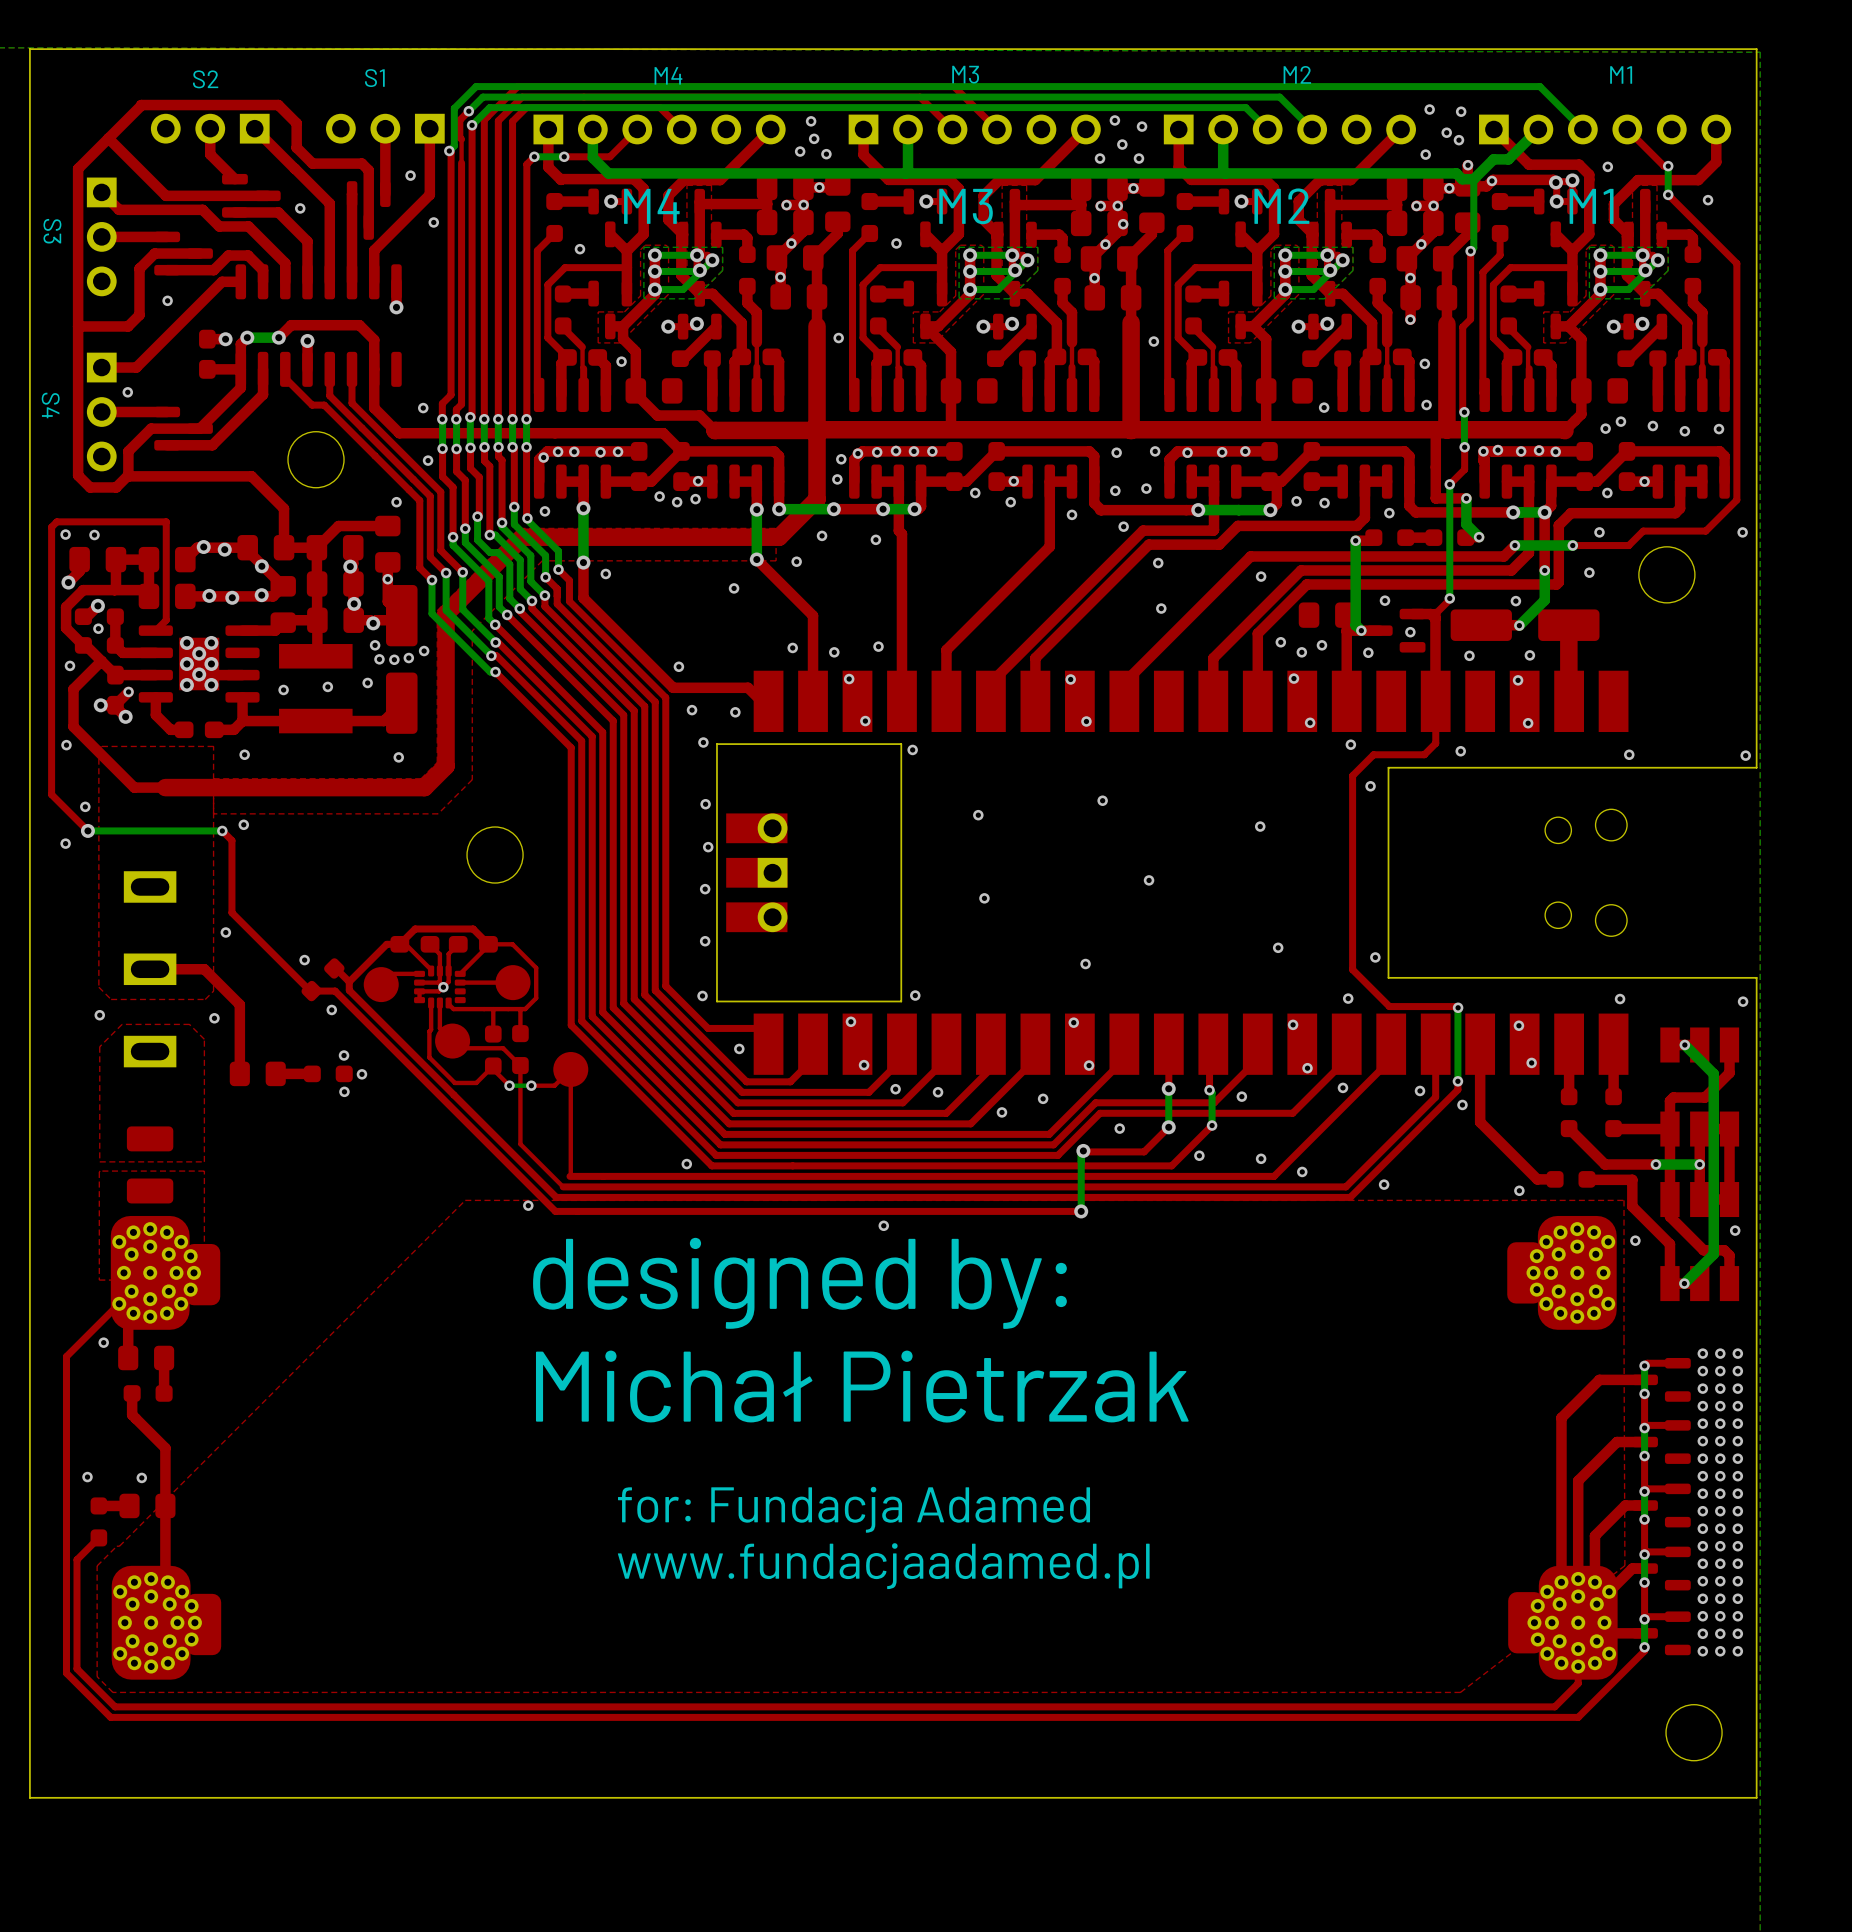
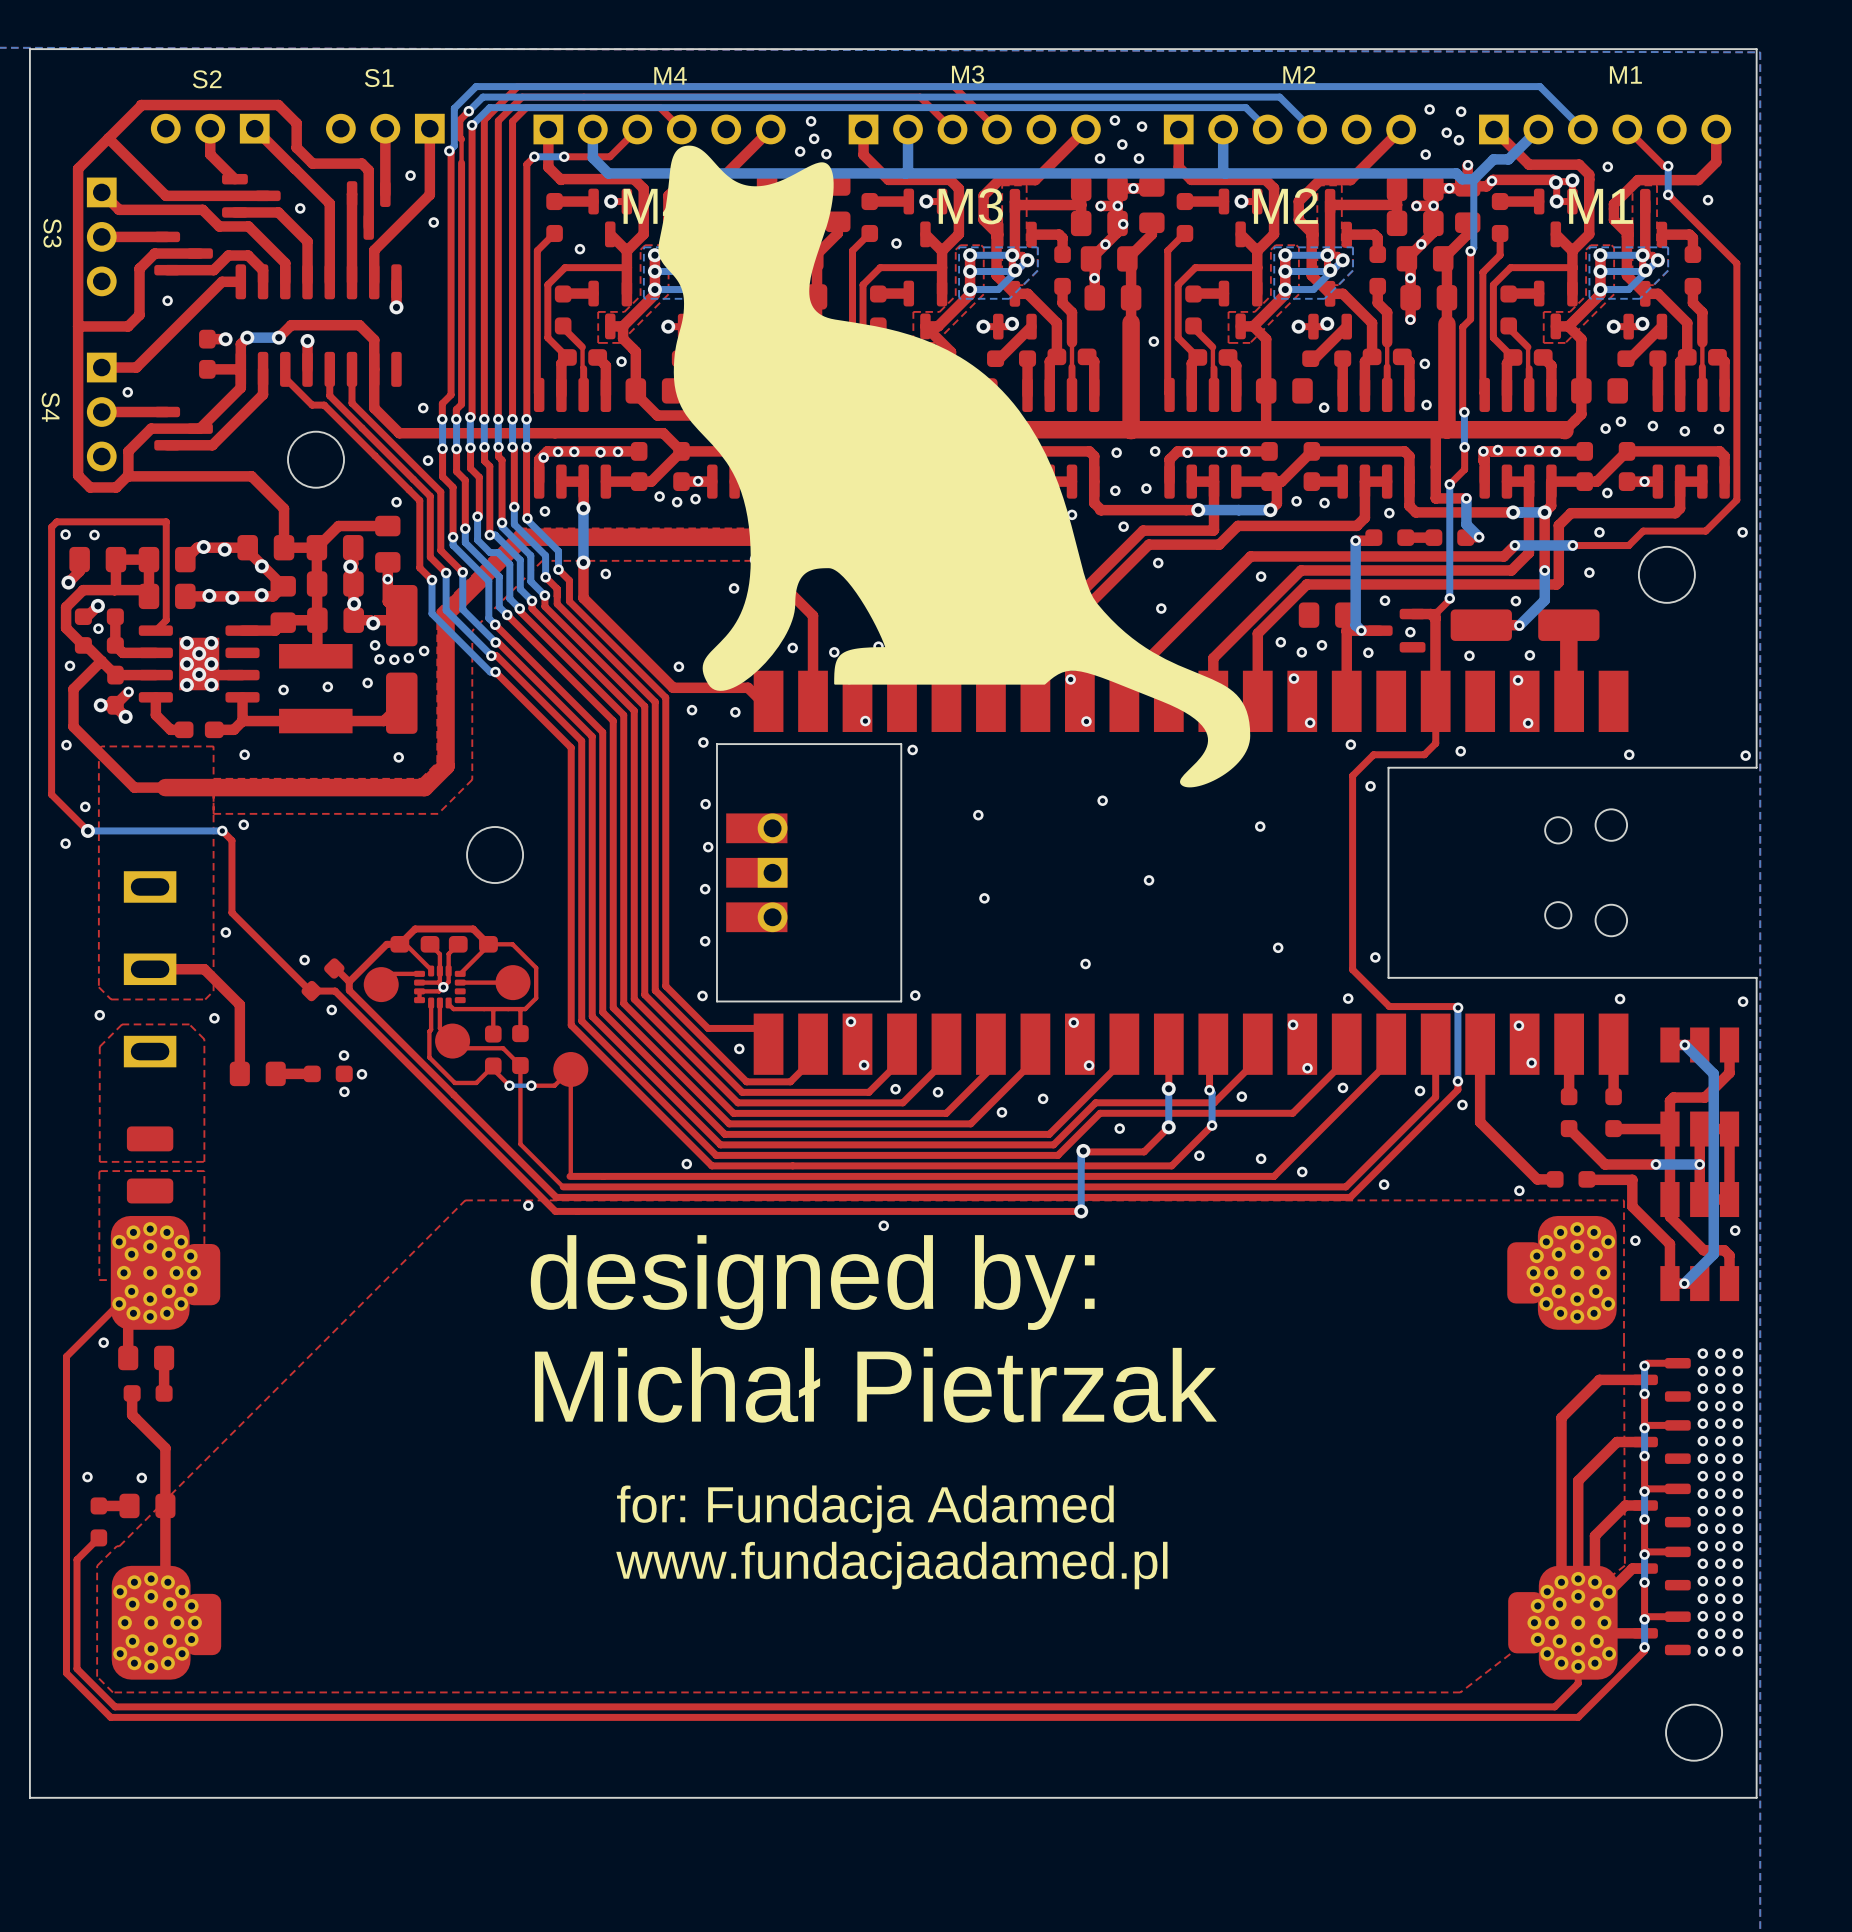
drawing: none -> [658, 145, 1251, 788]

